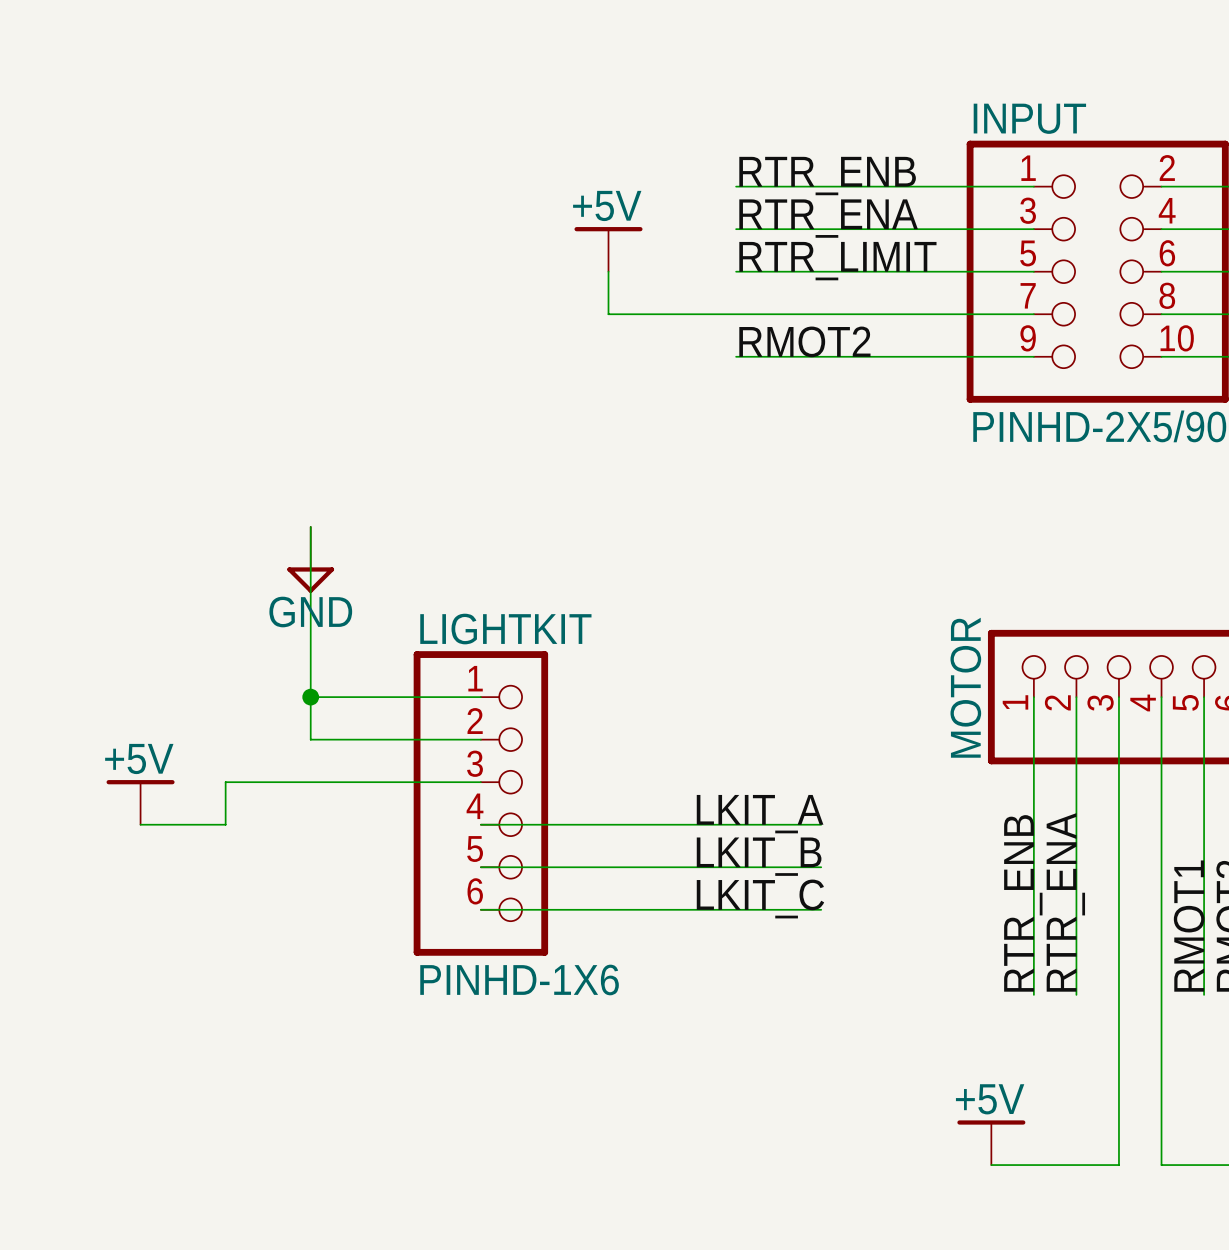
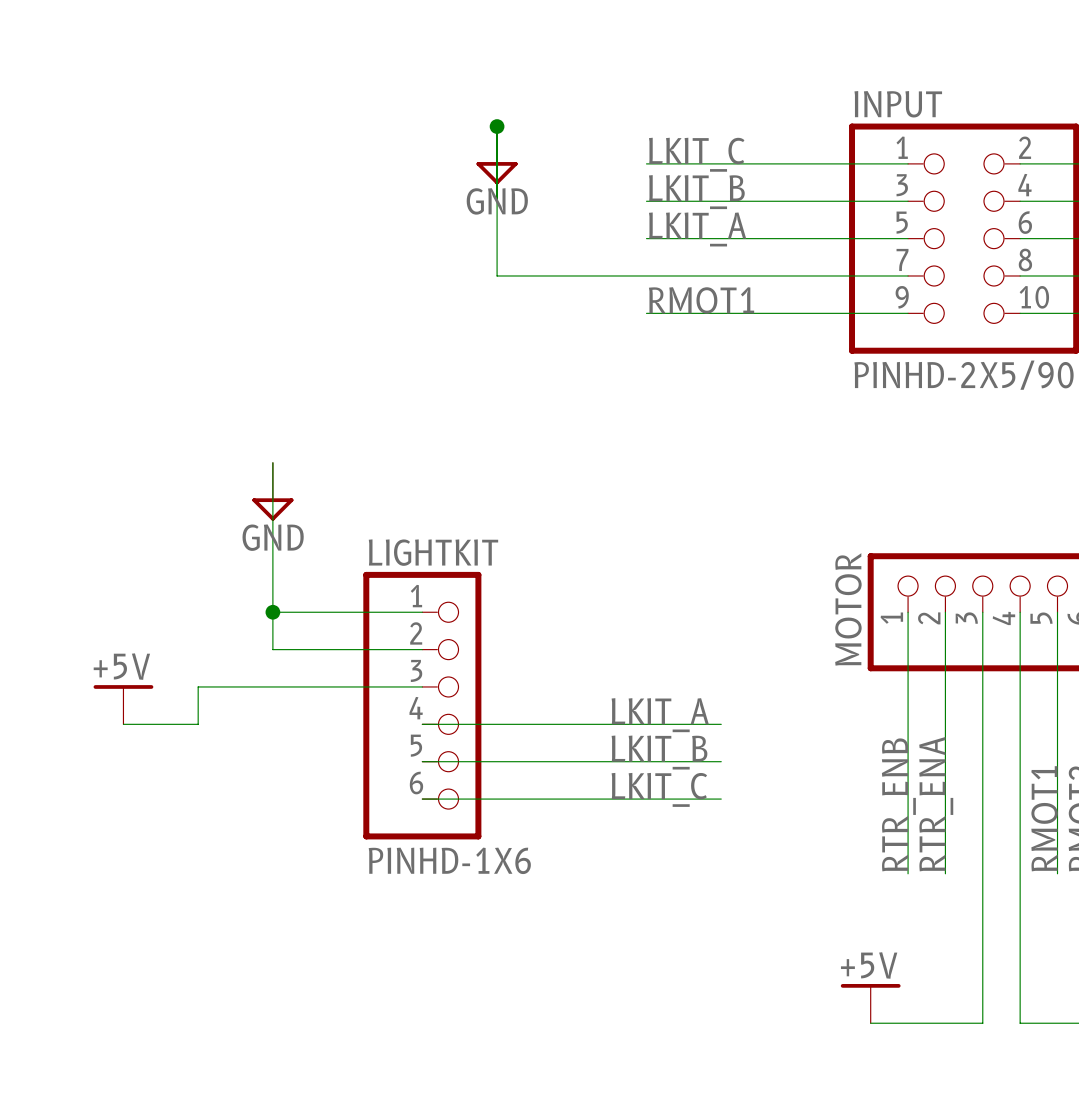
junction: none -> (497, 126)
label: RTR_ENB (827, 176) -> LKIT_C (696, 154)
power symbol: none -> GND (497, 155)
label: RTR_ENA (828, 218) -> LKIT_B (696, 192)
power symbol: +5V (608, 249) -> none
label: RTR_LIMIT (837, 261) -> LKIT_A (697, 229)
wire: (608, 271) (608, 314) -> (497, 126) (497, 275) (534, 275)
label: RMOT2 (804, 341) -> RMOT1 (701, 300)

